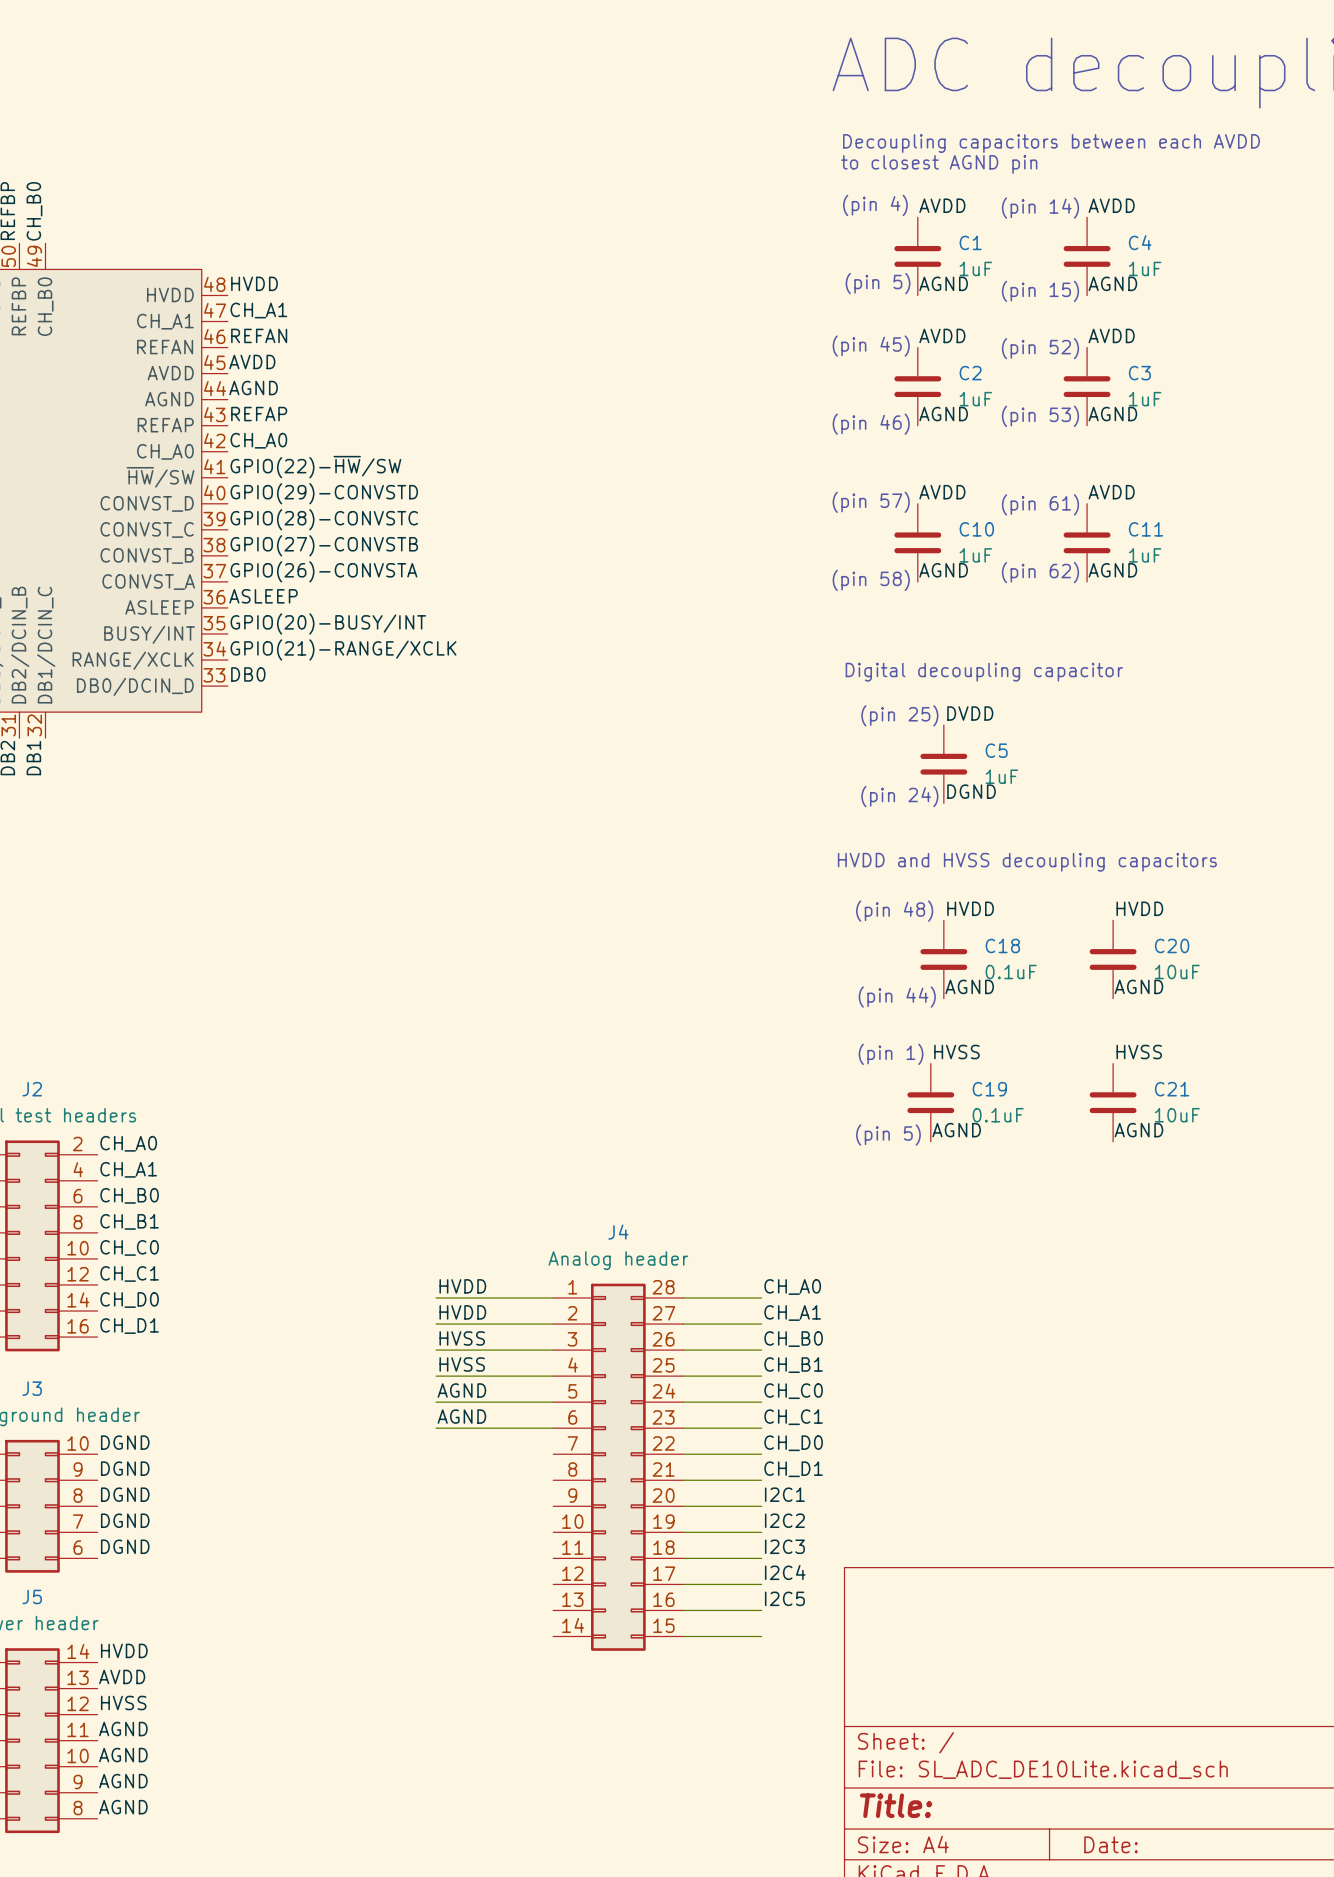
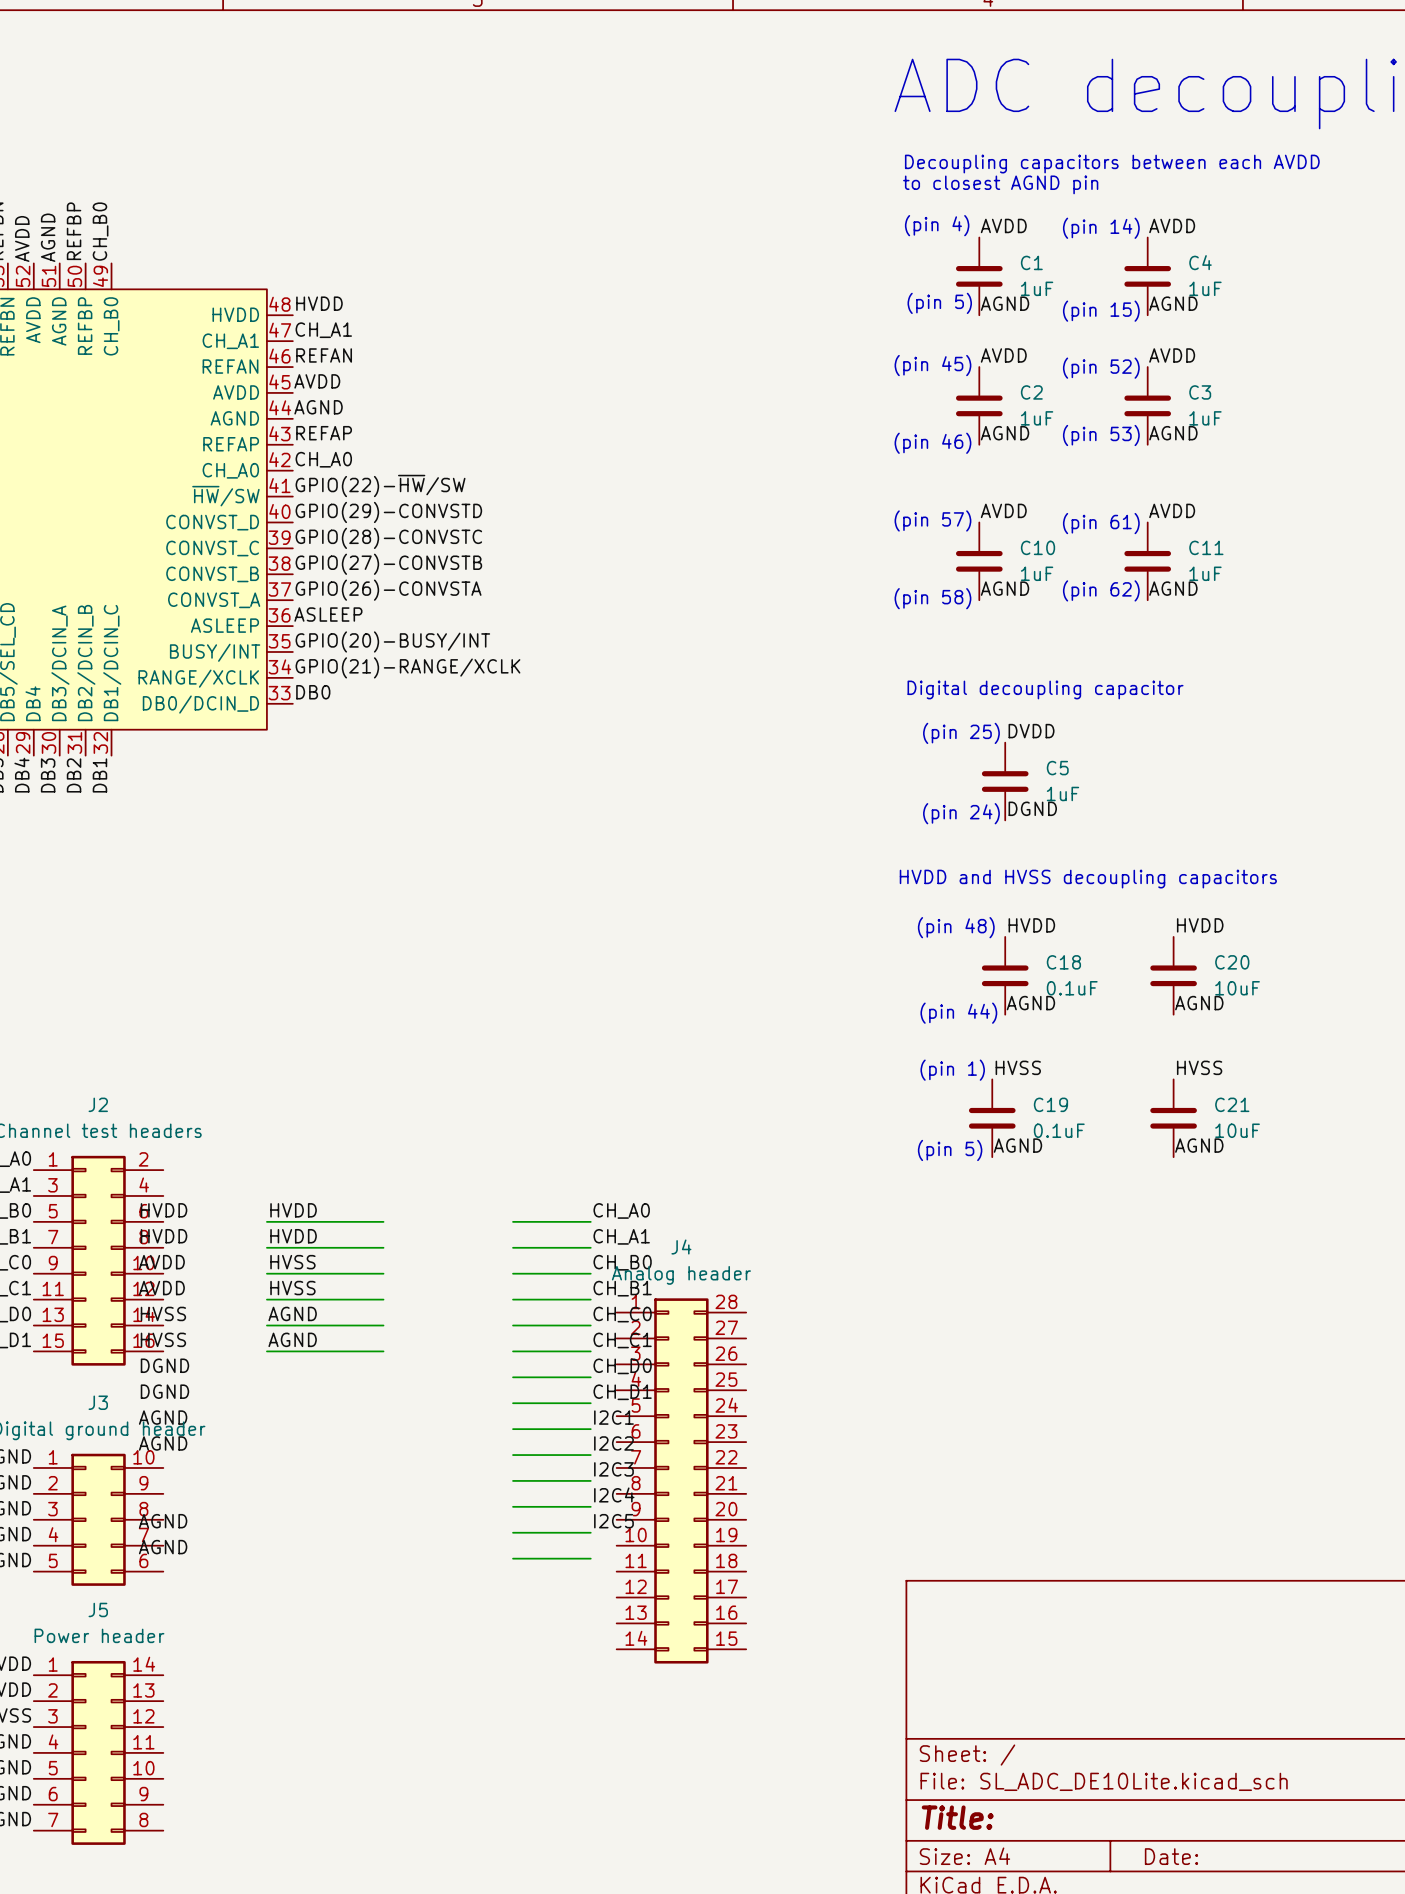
label: CH_A0 (128, 1143) -> none
label: CH_A1 (128, 1169) -> none
label: none -> HVDD (164, 1210)
label: CH_B0 (129, 1195) -> none
label: none -> HVDD (293, 1210)
label: none -> CH_A0 (621, 1210)
label: none -> HVDD (164, 1236)
label: CH_B1 (129, 1221) -> none
label: none -> HVDD (293, 1236)
label: none -> CH_A1 (621, 1236)
label: none -> AVDD (161, 1262)
label: CH_C0 (129, 1247) -> none
label: none -> HVSS (292, 1262)
label: none -> CH_B0 (622, 1262)
label: none -> AVDD (161, 1288)
label: CH_C1 (129, 1273) -> none
label: none -> HVSS (292, 1288)
label: none -> CH_B1 (622, 1288)
label: HVDD (462, 1286) -> none
label: CH_A0 (792, 1286) -> none
wire: (436, 1297) (553, 1297) -> (266, 1221) (383, 1221)
wire: (683, 1297) (761, 1297) -> (513, 1221) (590, 1221)
label: none -> HVSS (163, 1313)
label: none -> AGND (292, 1313)
label: CH_D0 (129, 1300) -> none
label: none -> CH_C0 (622, 1314)
label: HVDD (462, 1312) -> none
label: CH_A1 (792, 1313) -> none
wire: (436, 1324) (553, 1324) -> (266, 1247) (383, 1247)
wire: (683, 1324) (761, 1324) -> (513, 1247) (590, 1247)
label: none -> HVSS (163, 1339)
label: none -> AGND (292, 1339)
label: CH_D1 (129, 1326) -> none
label: none -> CH_C1 (622, 1340)
label: HVSS (462, 1338) -> none
label: CH_B0 (793, 1339) -> none
wire: (436, 1350) (553, 1350) -> (266, 1273) (383, 1273)
wire: (683, 1350) (761, 1350) -> (513, 1273) (590, 1273)
label: none -> DGND (164, 1365)
label: none -> CH_D0 (622, 1366)
label: HVSS (462, 1364) -> none
label: CH_B1 (793, 1365) -> none
wire: (436, 1376) (553, 1376) -> (266, 1299) (383, 1299)
wire: (683, 1376) (761, 1376) -> (513, 1299) (590, 1299)
label: none -> DGND (164, 1391)
label: none -> CH_D1 (622, 1392)
label: AGND (461, 1390) -> none
label: CH_C0 (793, 1391) -> none
wire: (436, 1402) (553, 1402) -> (266, 1325) (383, 1325)
wire: (683, 1402) (761, 1402) -> (513, 1325) (590, 1325)
label: none -> AGND (163, 1417)
label: AGND (461, 1416) -> none
label: CH_C1 (793, 1417) -> none
wire: (436, 1428) (553, 1428) -> (266, 1351) (383, 1351)
wire: (683, 1428) (761, 1428) -> (513, 1351) (590, 1351)
label: DGND (125, 1442) -> AGND (163, 1443)
label: CH_D0 (793, 1443) -> none
wire: (683, 1454) (761, 1454) -> (513, 1377) (590, 1377)
label: DGND (125, 1468) -> none
label: CH_D1 (793, 1469) -> none
wire: (683, 1480) (761, 1480) -> (513, 1403) (590, 1403)
label: DGND (125, 1494) -> none
label position: I2C1 (784, 1494) -> I2C1 (613, 1417)
wire: (683, 1506) (761, 1506) -> (513, 1429) (590, 1429)
label: none -> AGND (163, 1521)
label: DGND (125, 1520) -> none
label position: I2C2 (784, 1520) -> I2C2 (613, 1443)
wire: (683, 1532) (761, 1532) -> (513, 1455) (590, 1455)
label: none -> AGND (163, 1547)
label: DGND (125, 1546) -> none
label position: I2C3 (784, 1546) -> I2C3 (613, 1469)
wire: (683, 1558) (761, 1558) -> (513, 1480) (590, 1480)
label position: I2C4 (785, 1572) -> I2C4 (614, 1494)
wire: (683, 1584) (761, 1584) -> (513, 1506) (590, 1506)
label position: I2C5 (784, 1598) -> I2C5 (613, 1521)
wire: (683, 1610) (761, 1610) -> (513, 1532) (590, 1532)
wire: (683, 1636) (761, 1636) -> (513, 1558) (590, 1558)
label: HVDD (124, 1650) -> none
label: AVDD (122, 1676) -> none
label: HVSS (123, 1703) -> none
label: AGND (123, 1729) -> none
label: AGND (123, 1755) -> none
label: AGND (123, 1781) -> none
label: AGND (123, 1807) -> none

